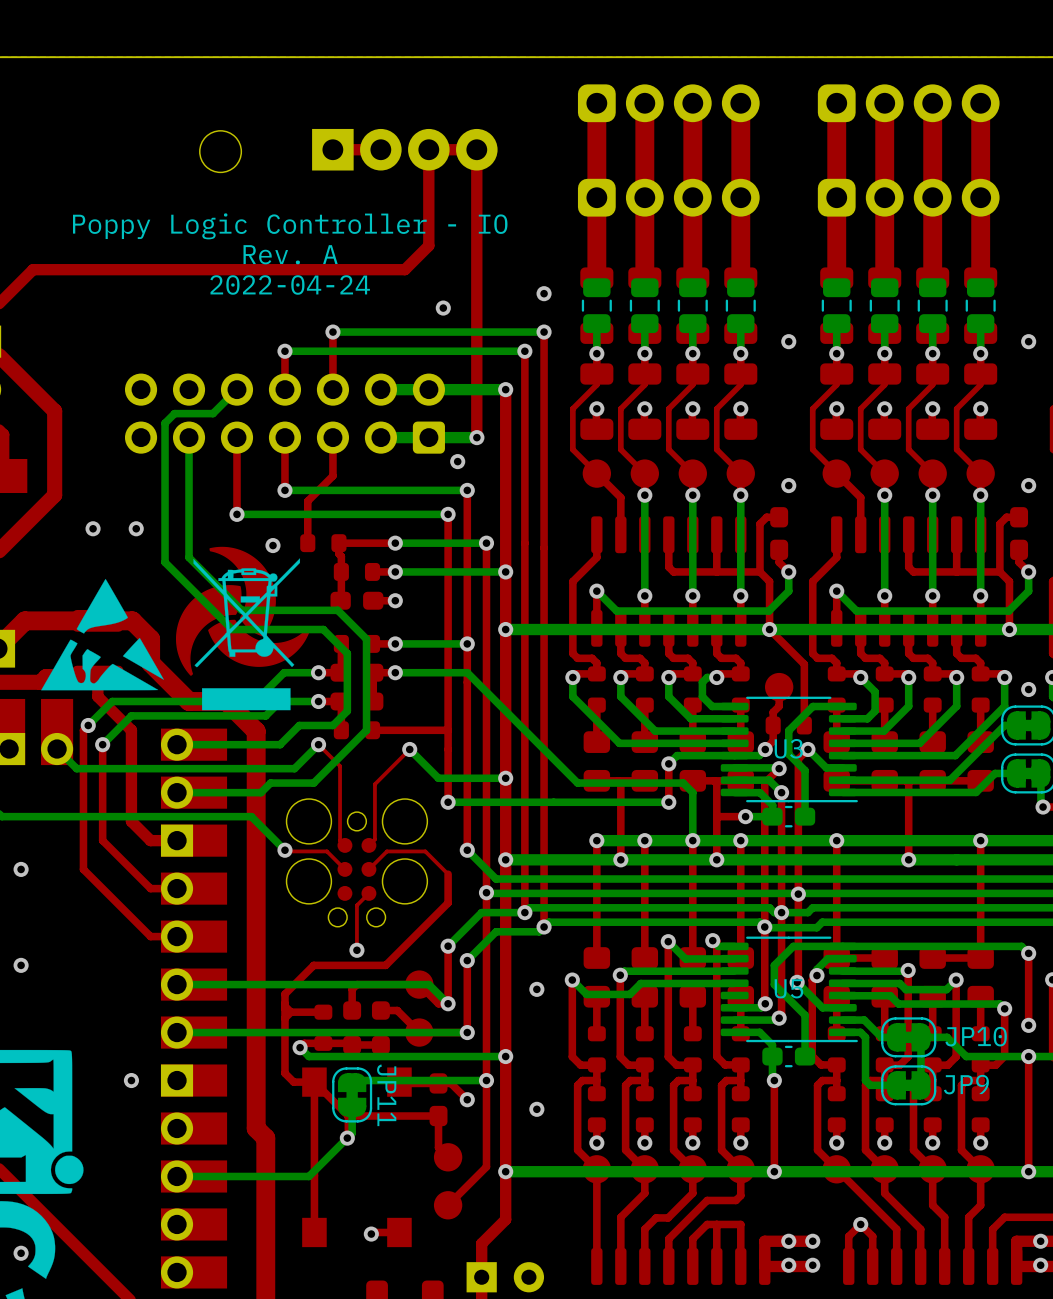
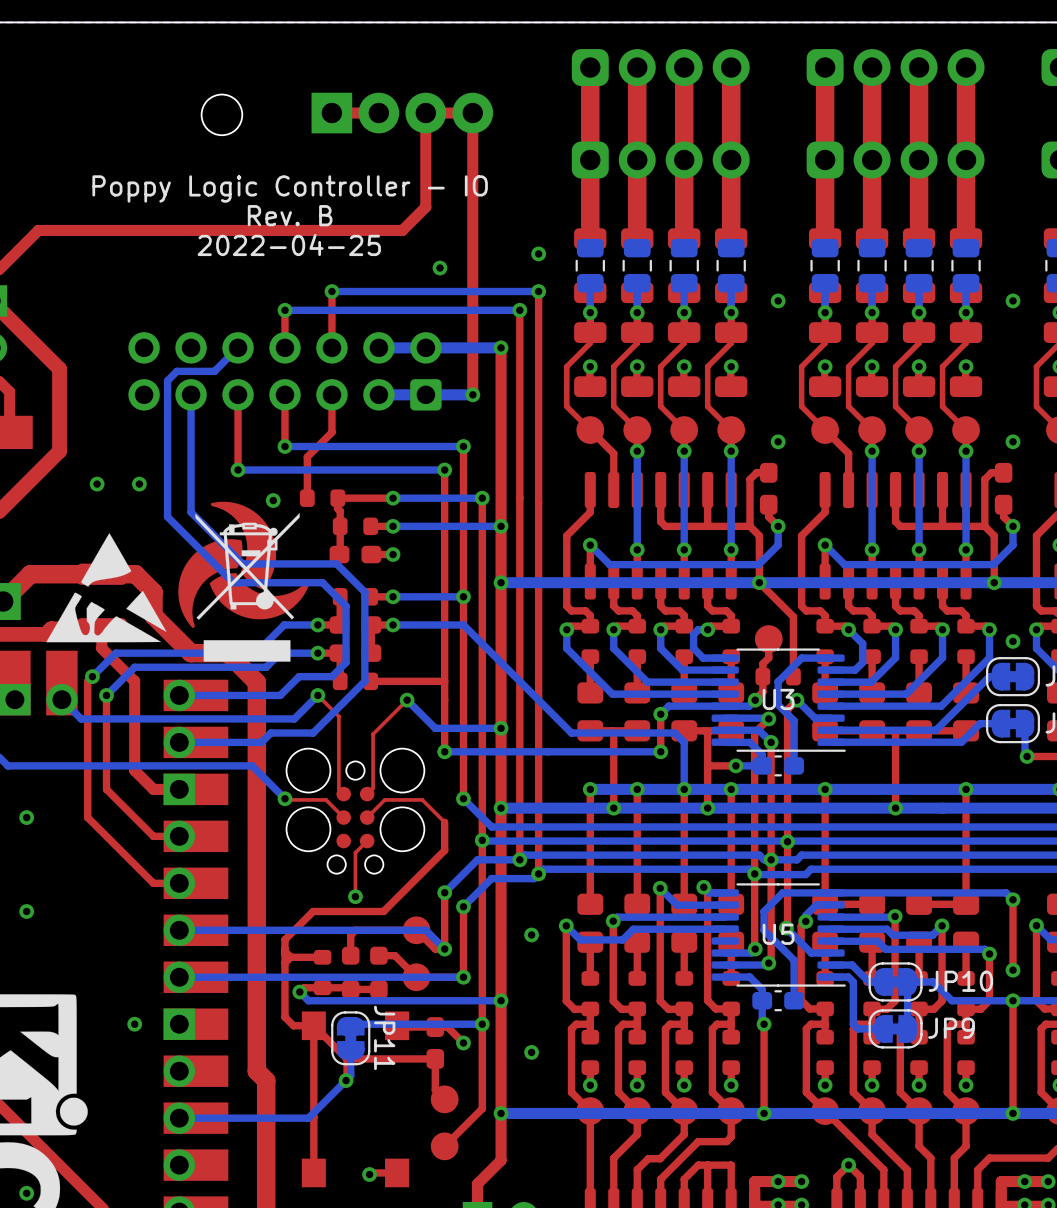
text: Rev. A (290, 254) -> Rev. B (290, 215)
text: 2022-04-24 (290, 284) -> 2022-04-25 (289, 245)
via: (457, 461) -> none

